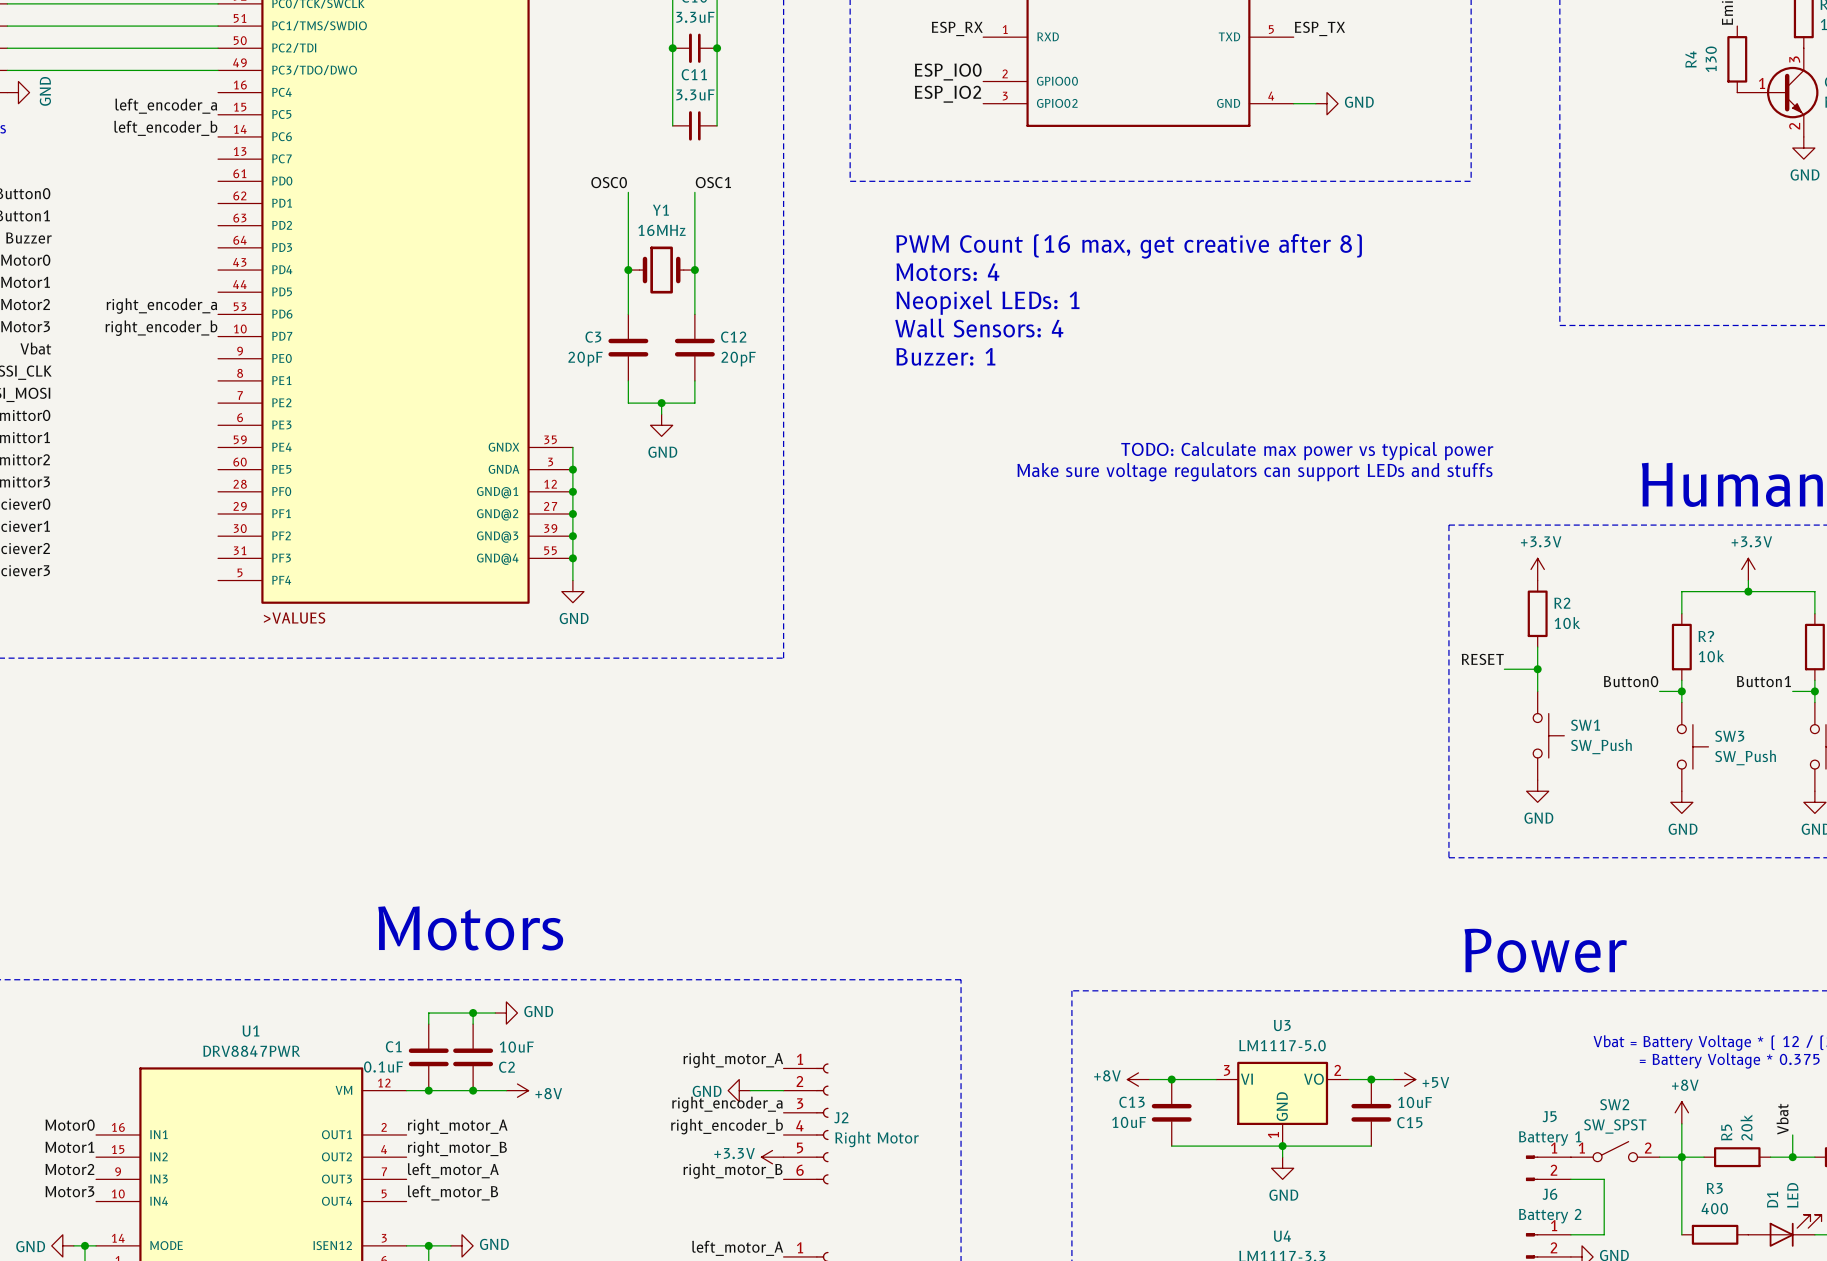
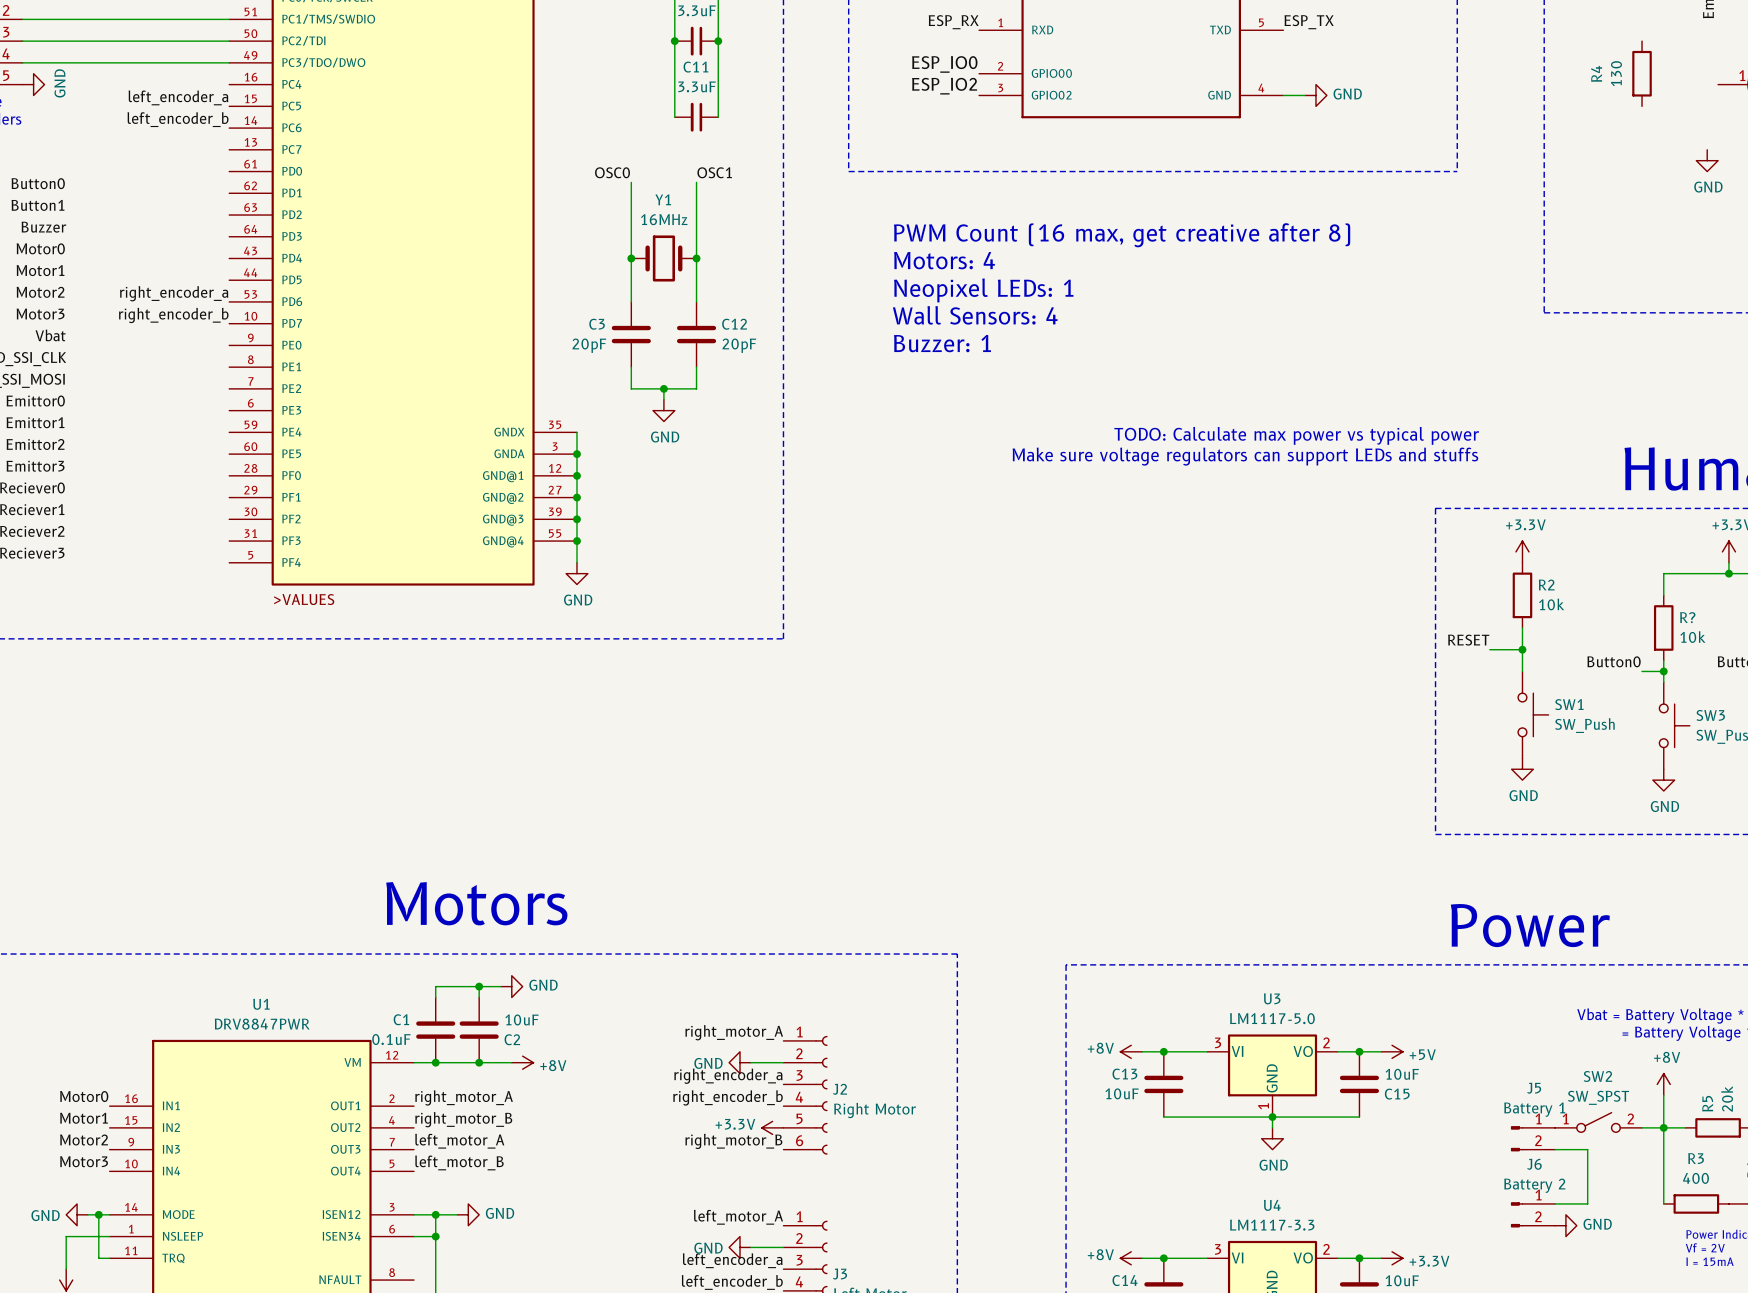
R4 position: (1737, 59) -> (1642, 73)
power symbol: none -> GND (1707, 160)

